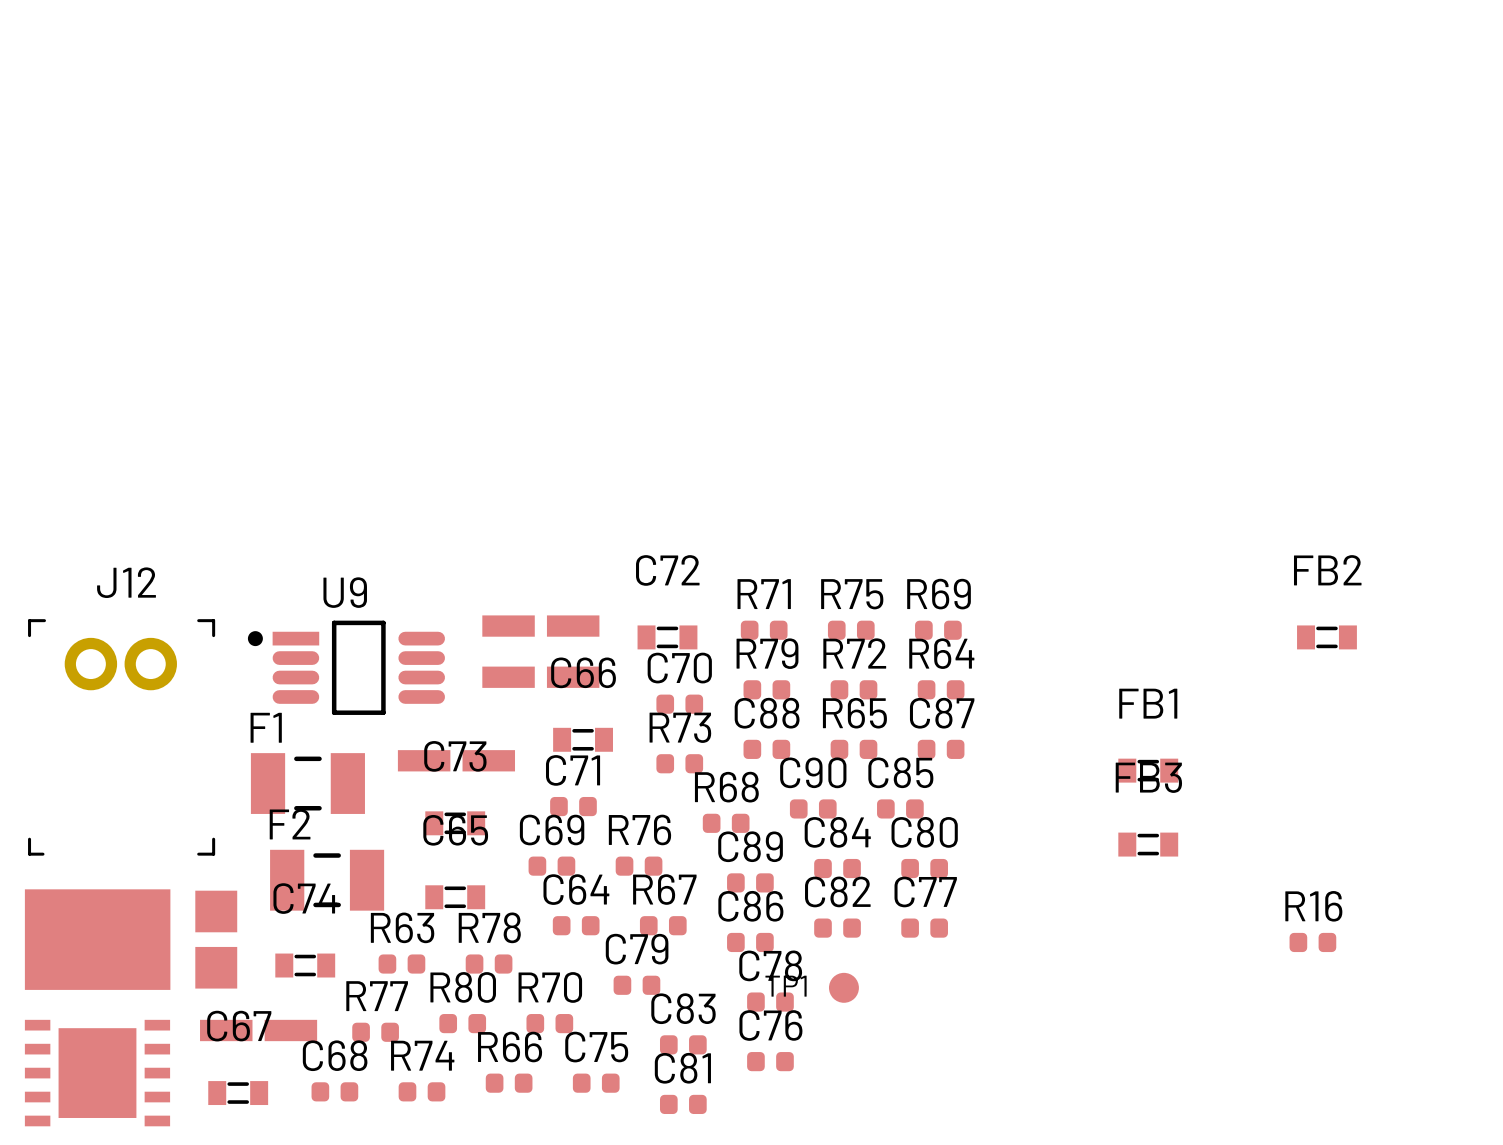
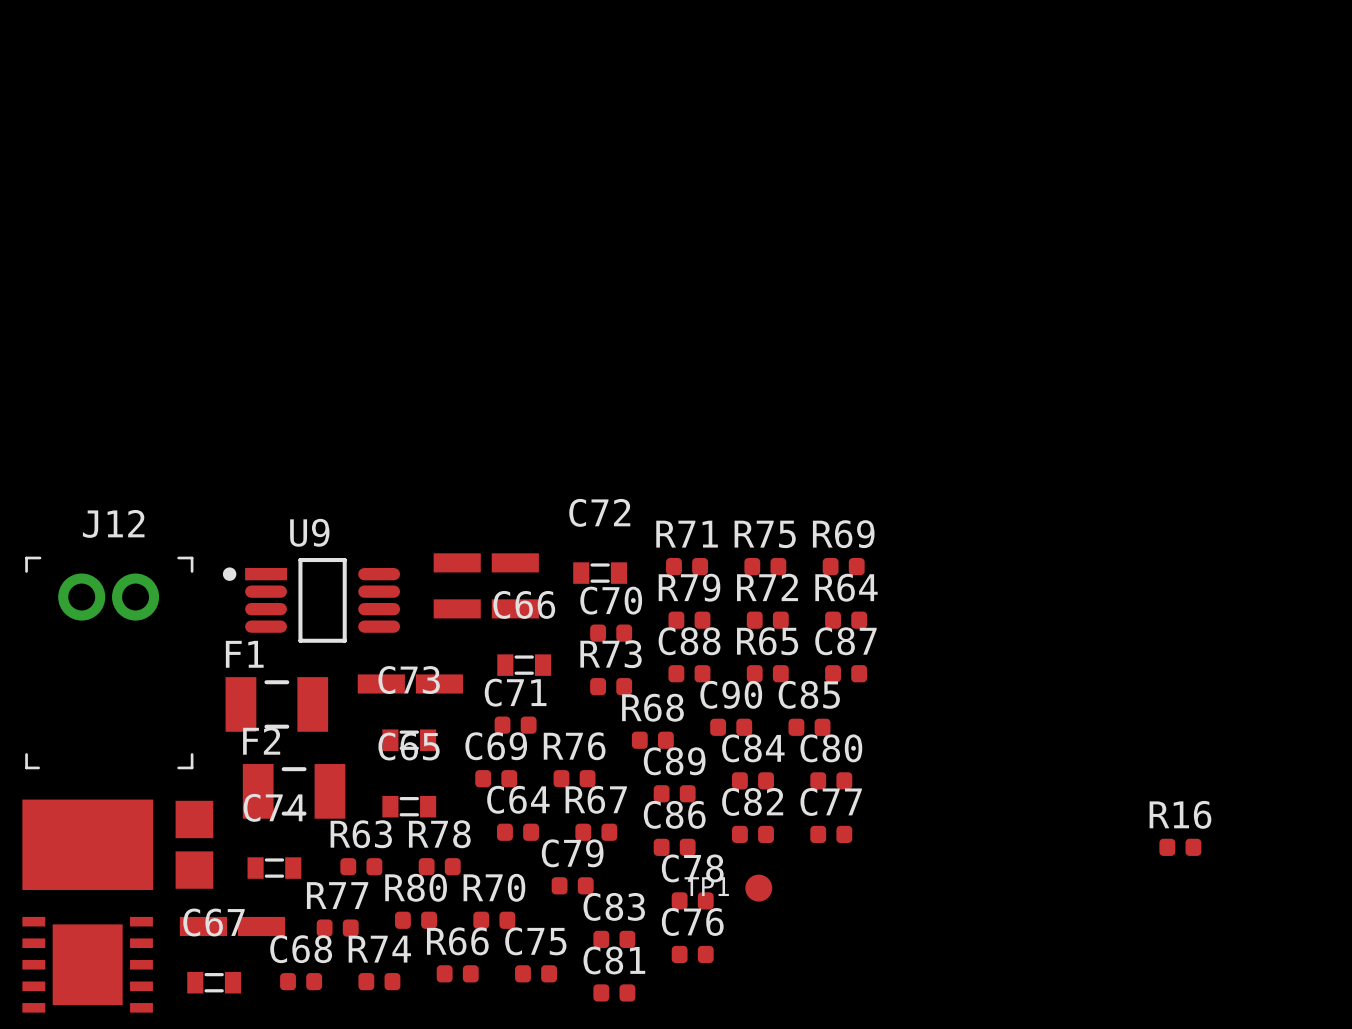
FB2: (1326, 637) -> none
FB1: (1148, 770) -> none
FB3: (1148, 844) -> none

